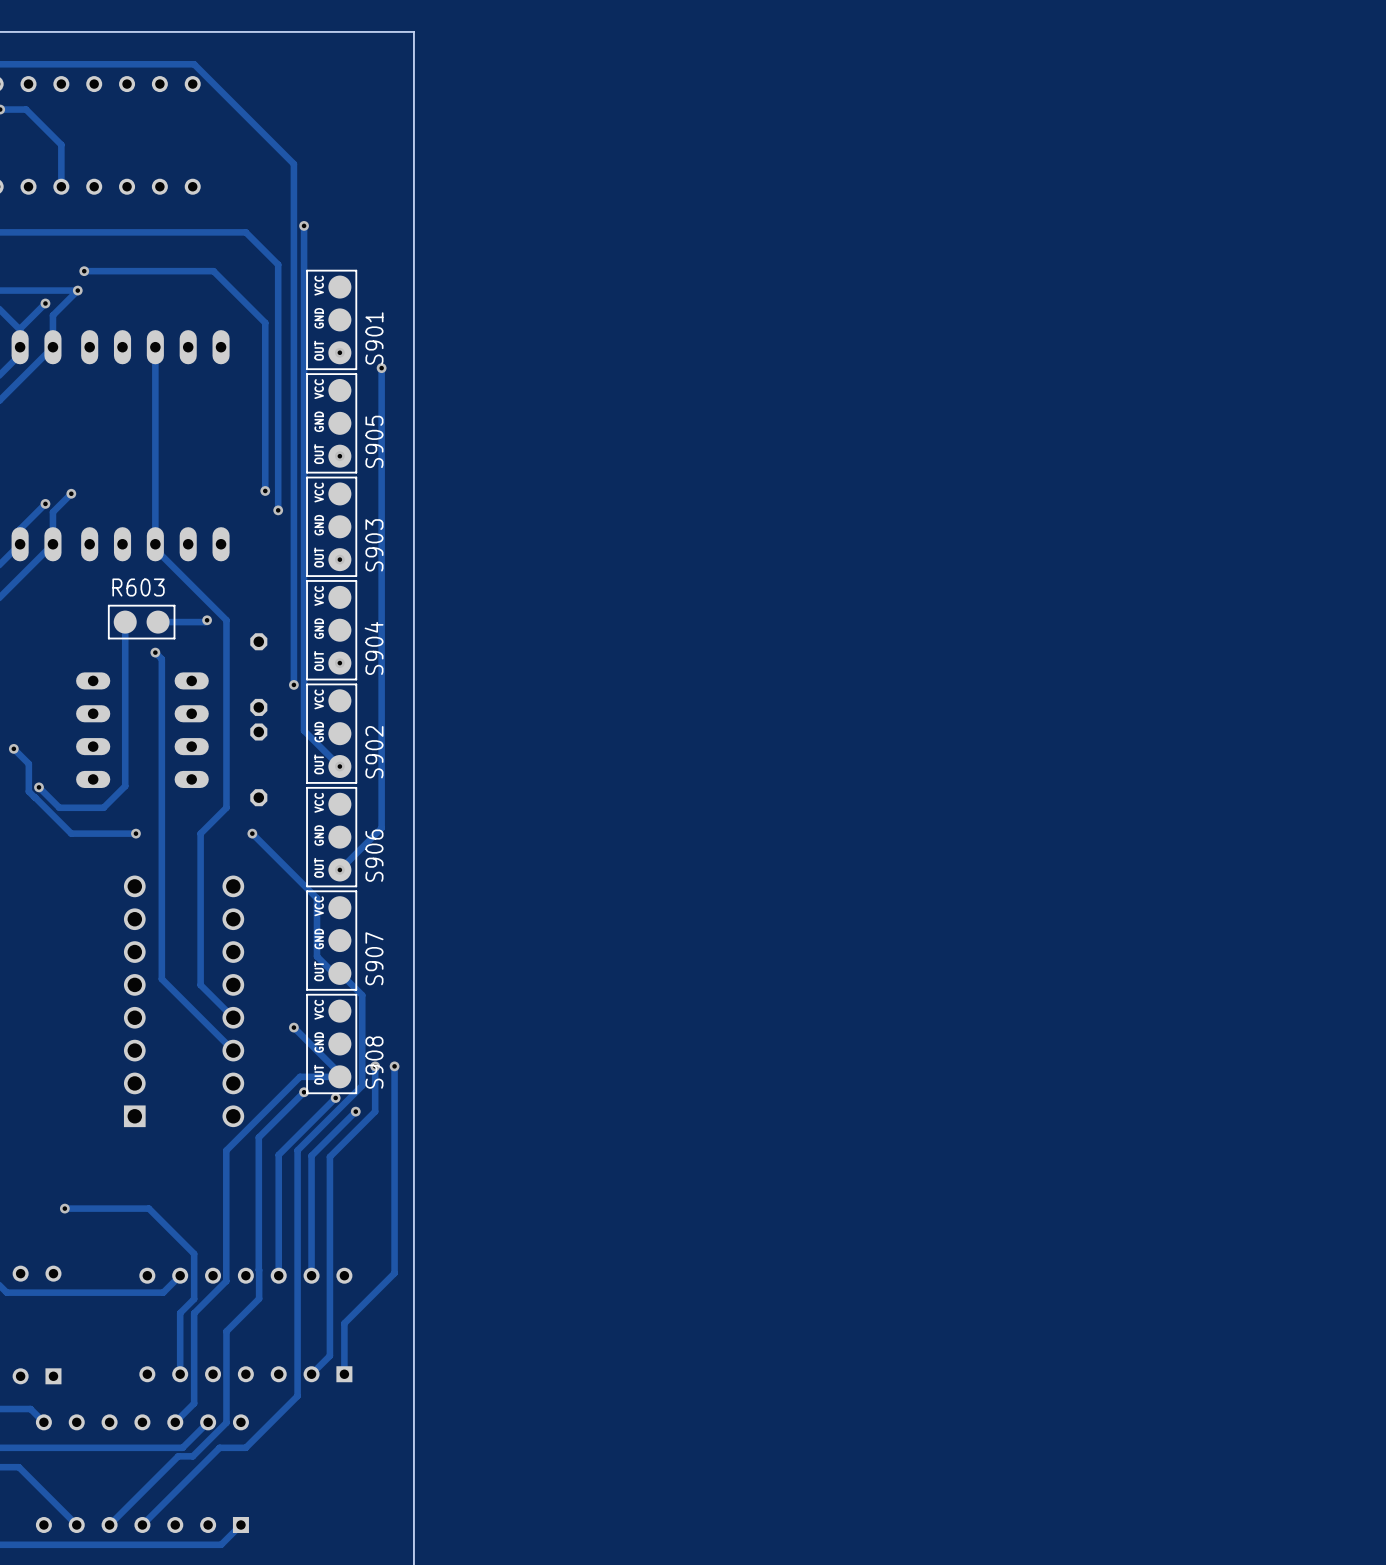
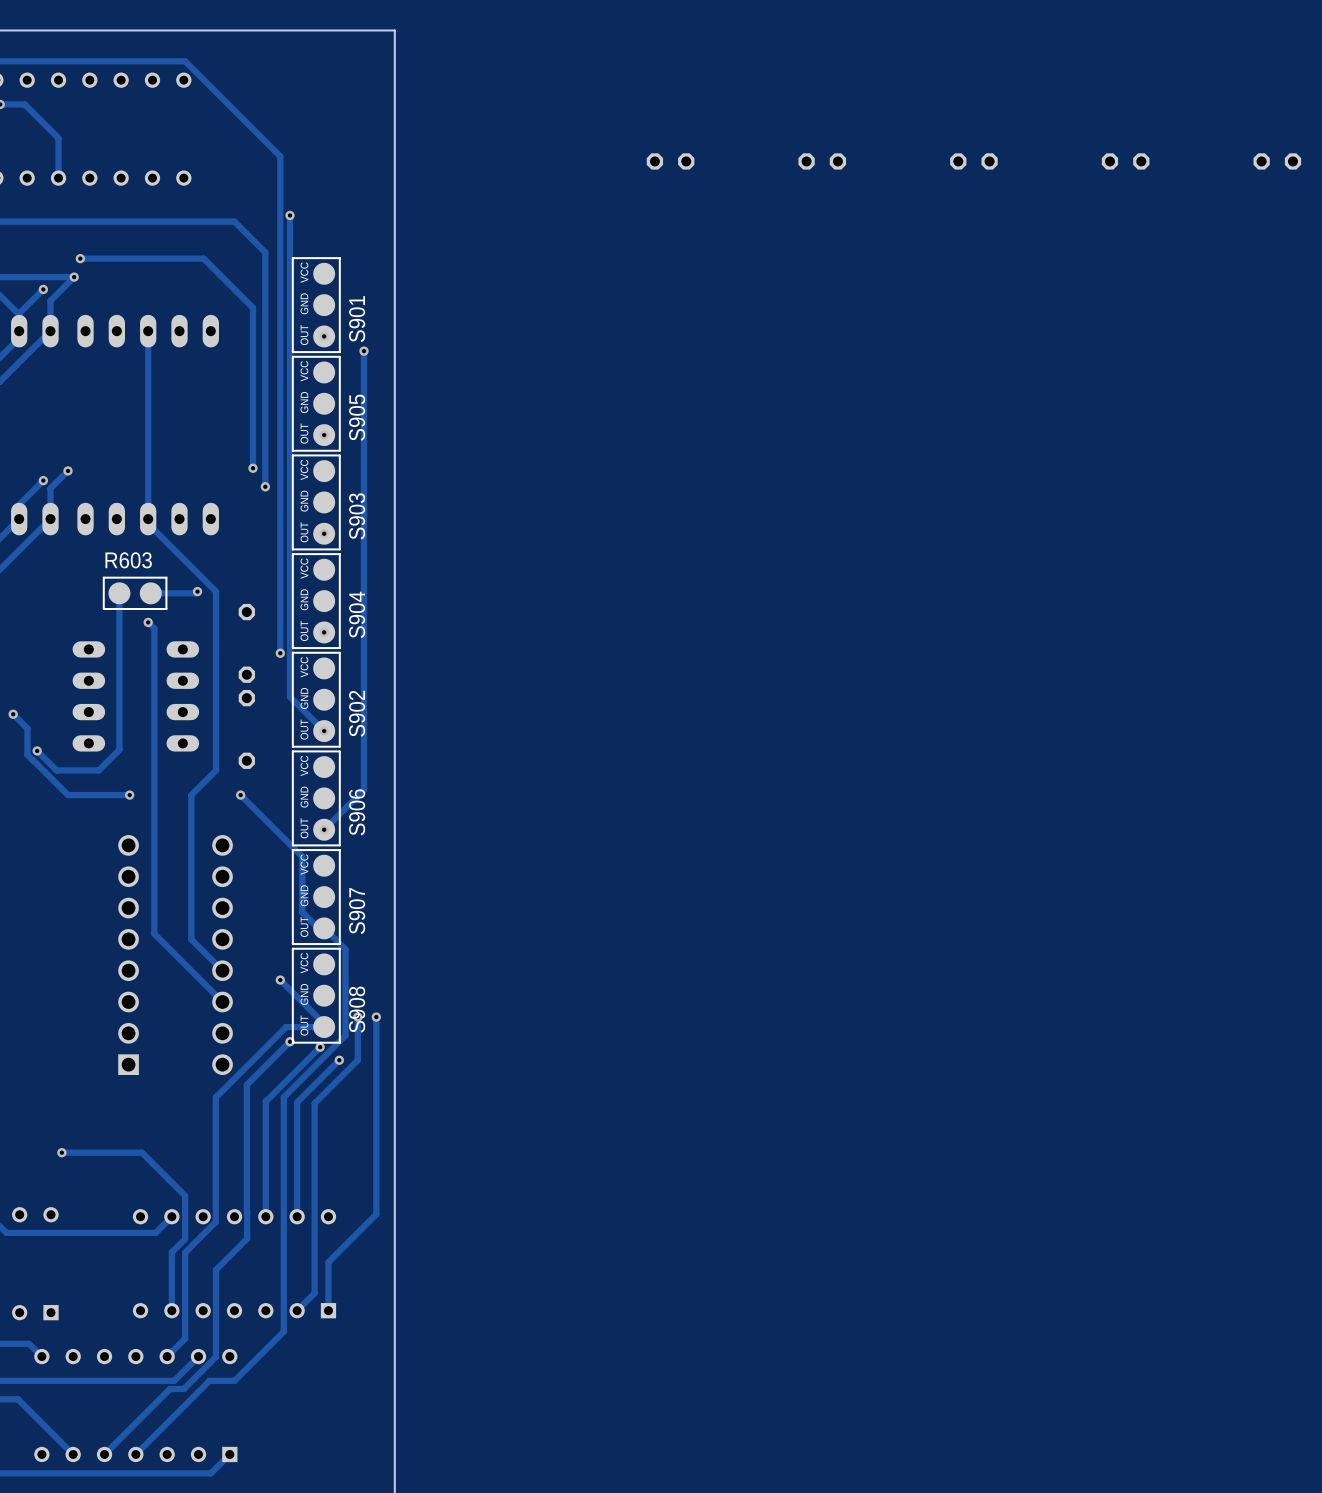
part: none -> (670, 161)
part: none -> (822, 161)
part: none -> (973, 161)
part: none -> (1125, 161)
part: none -> (1277, 161)

